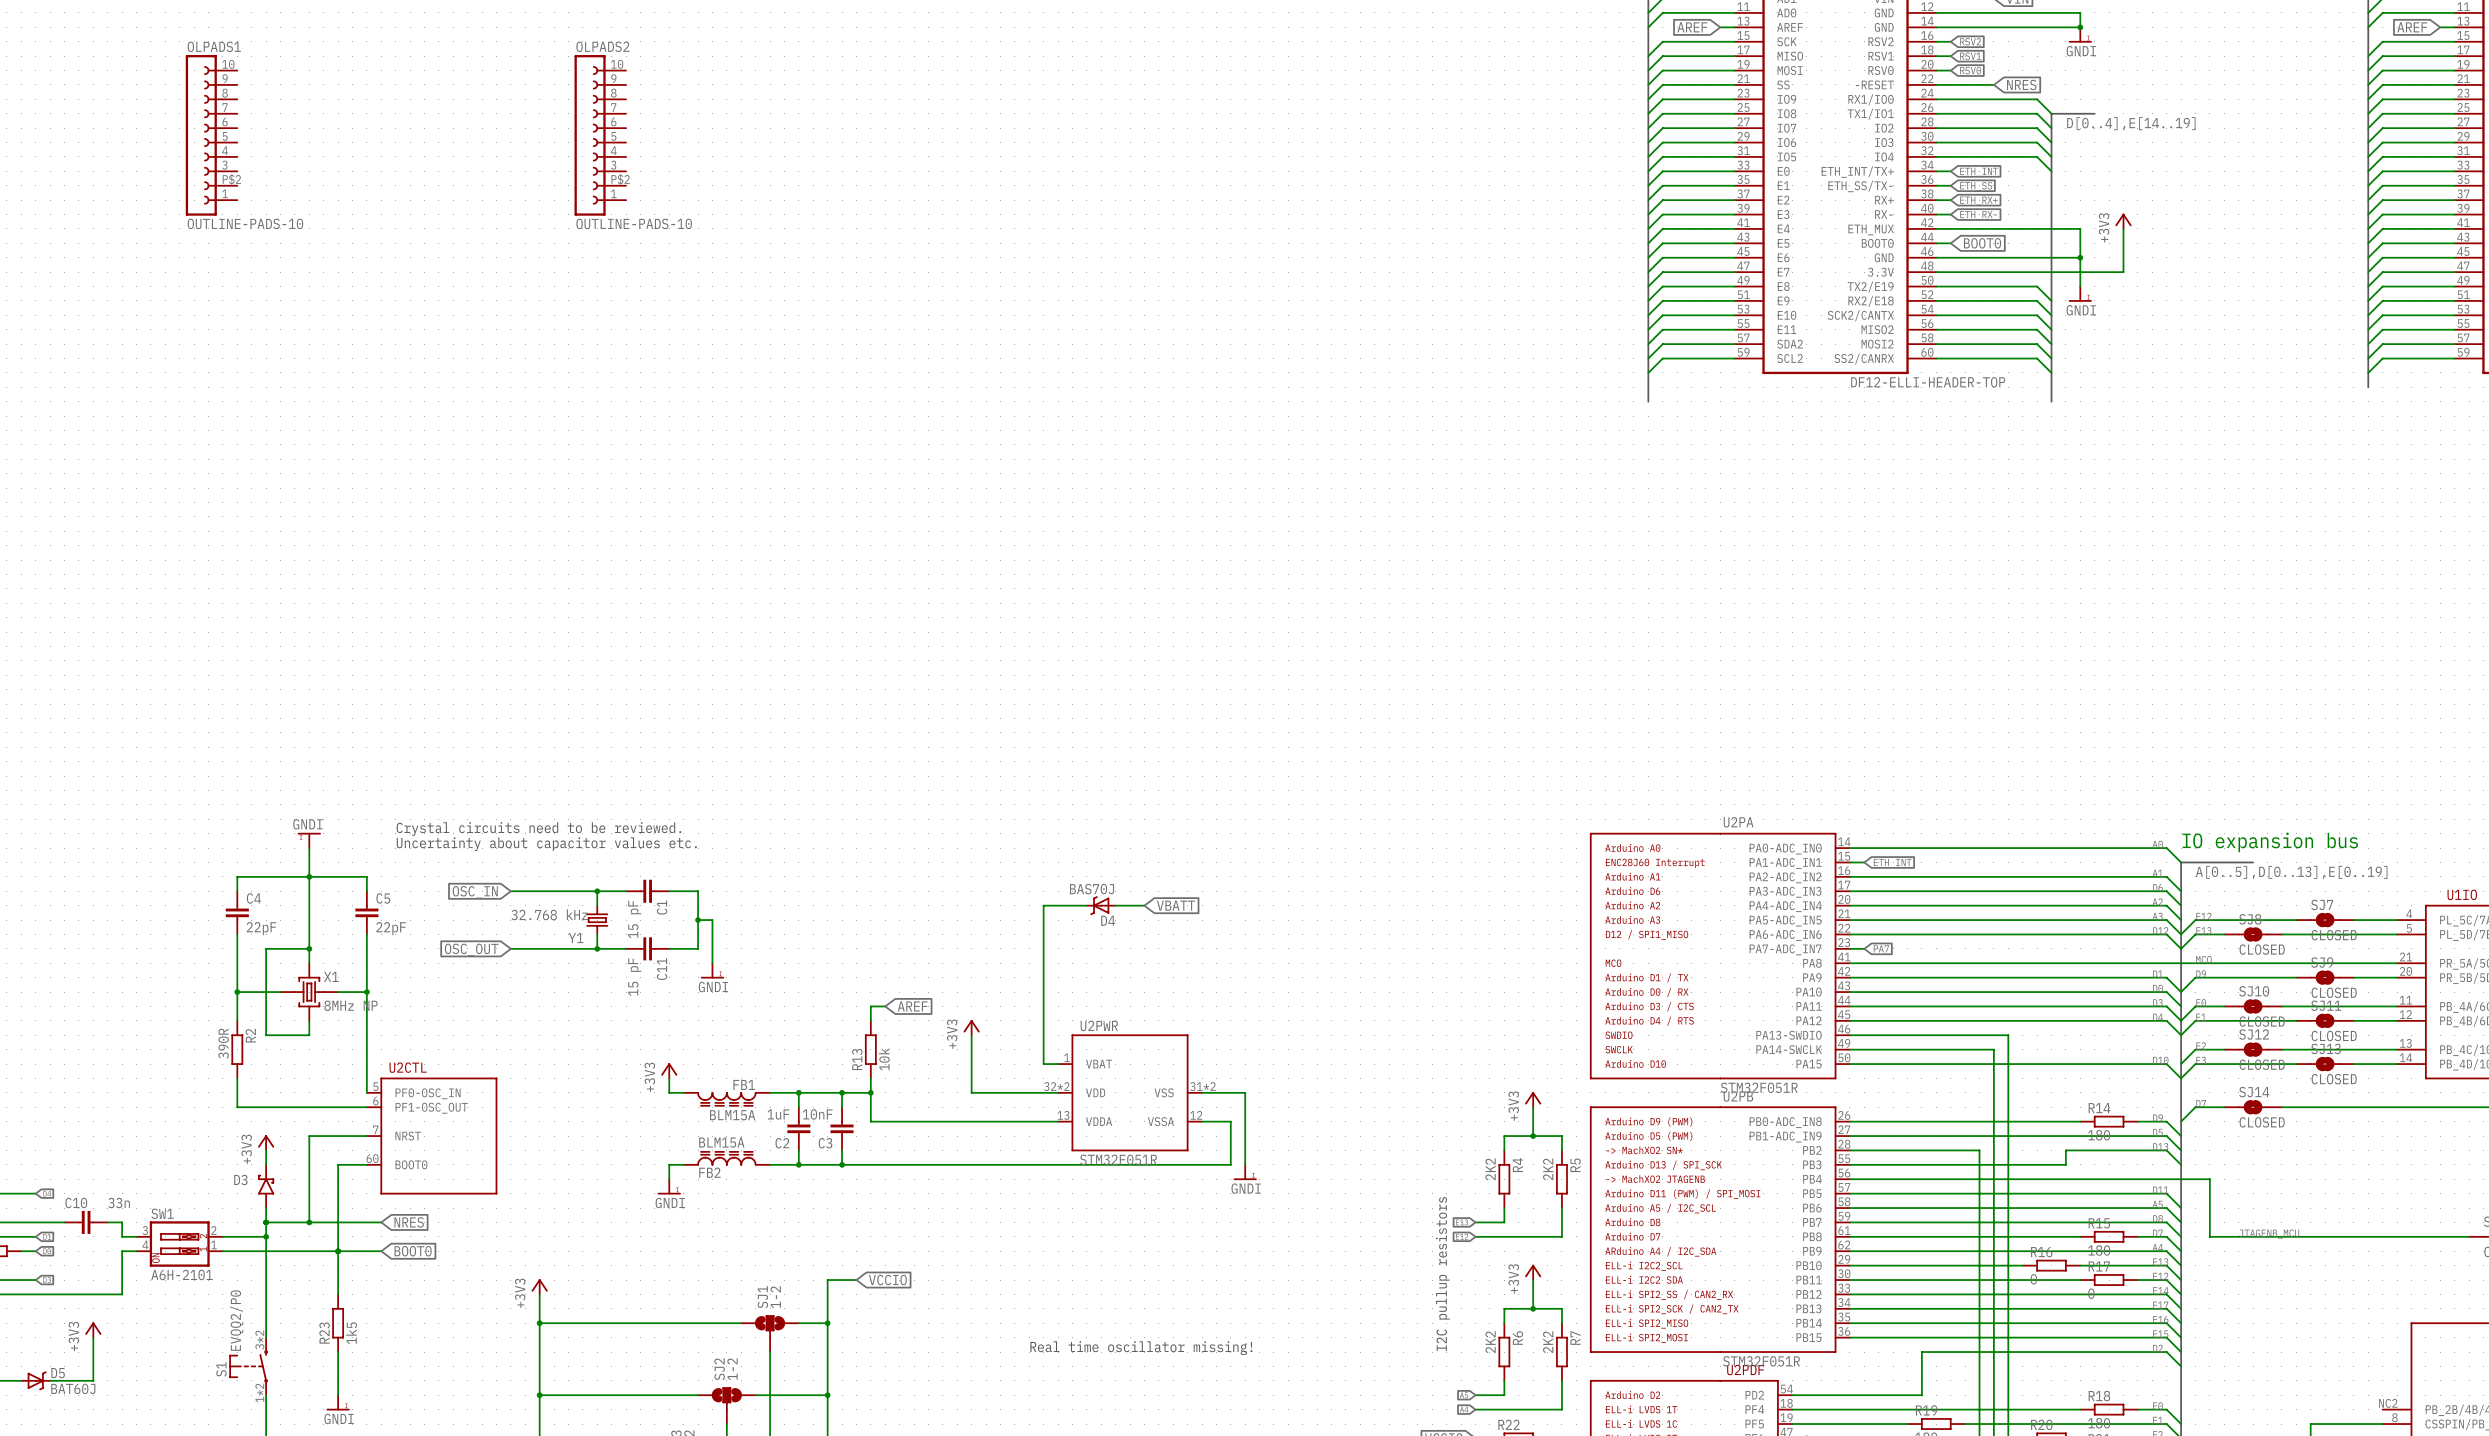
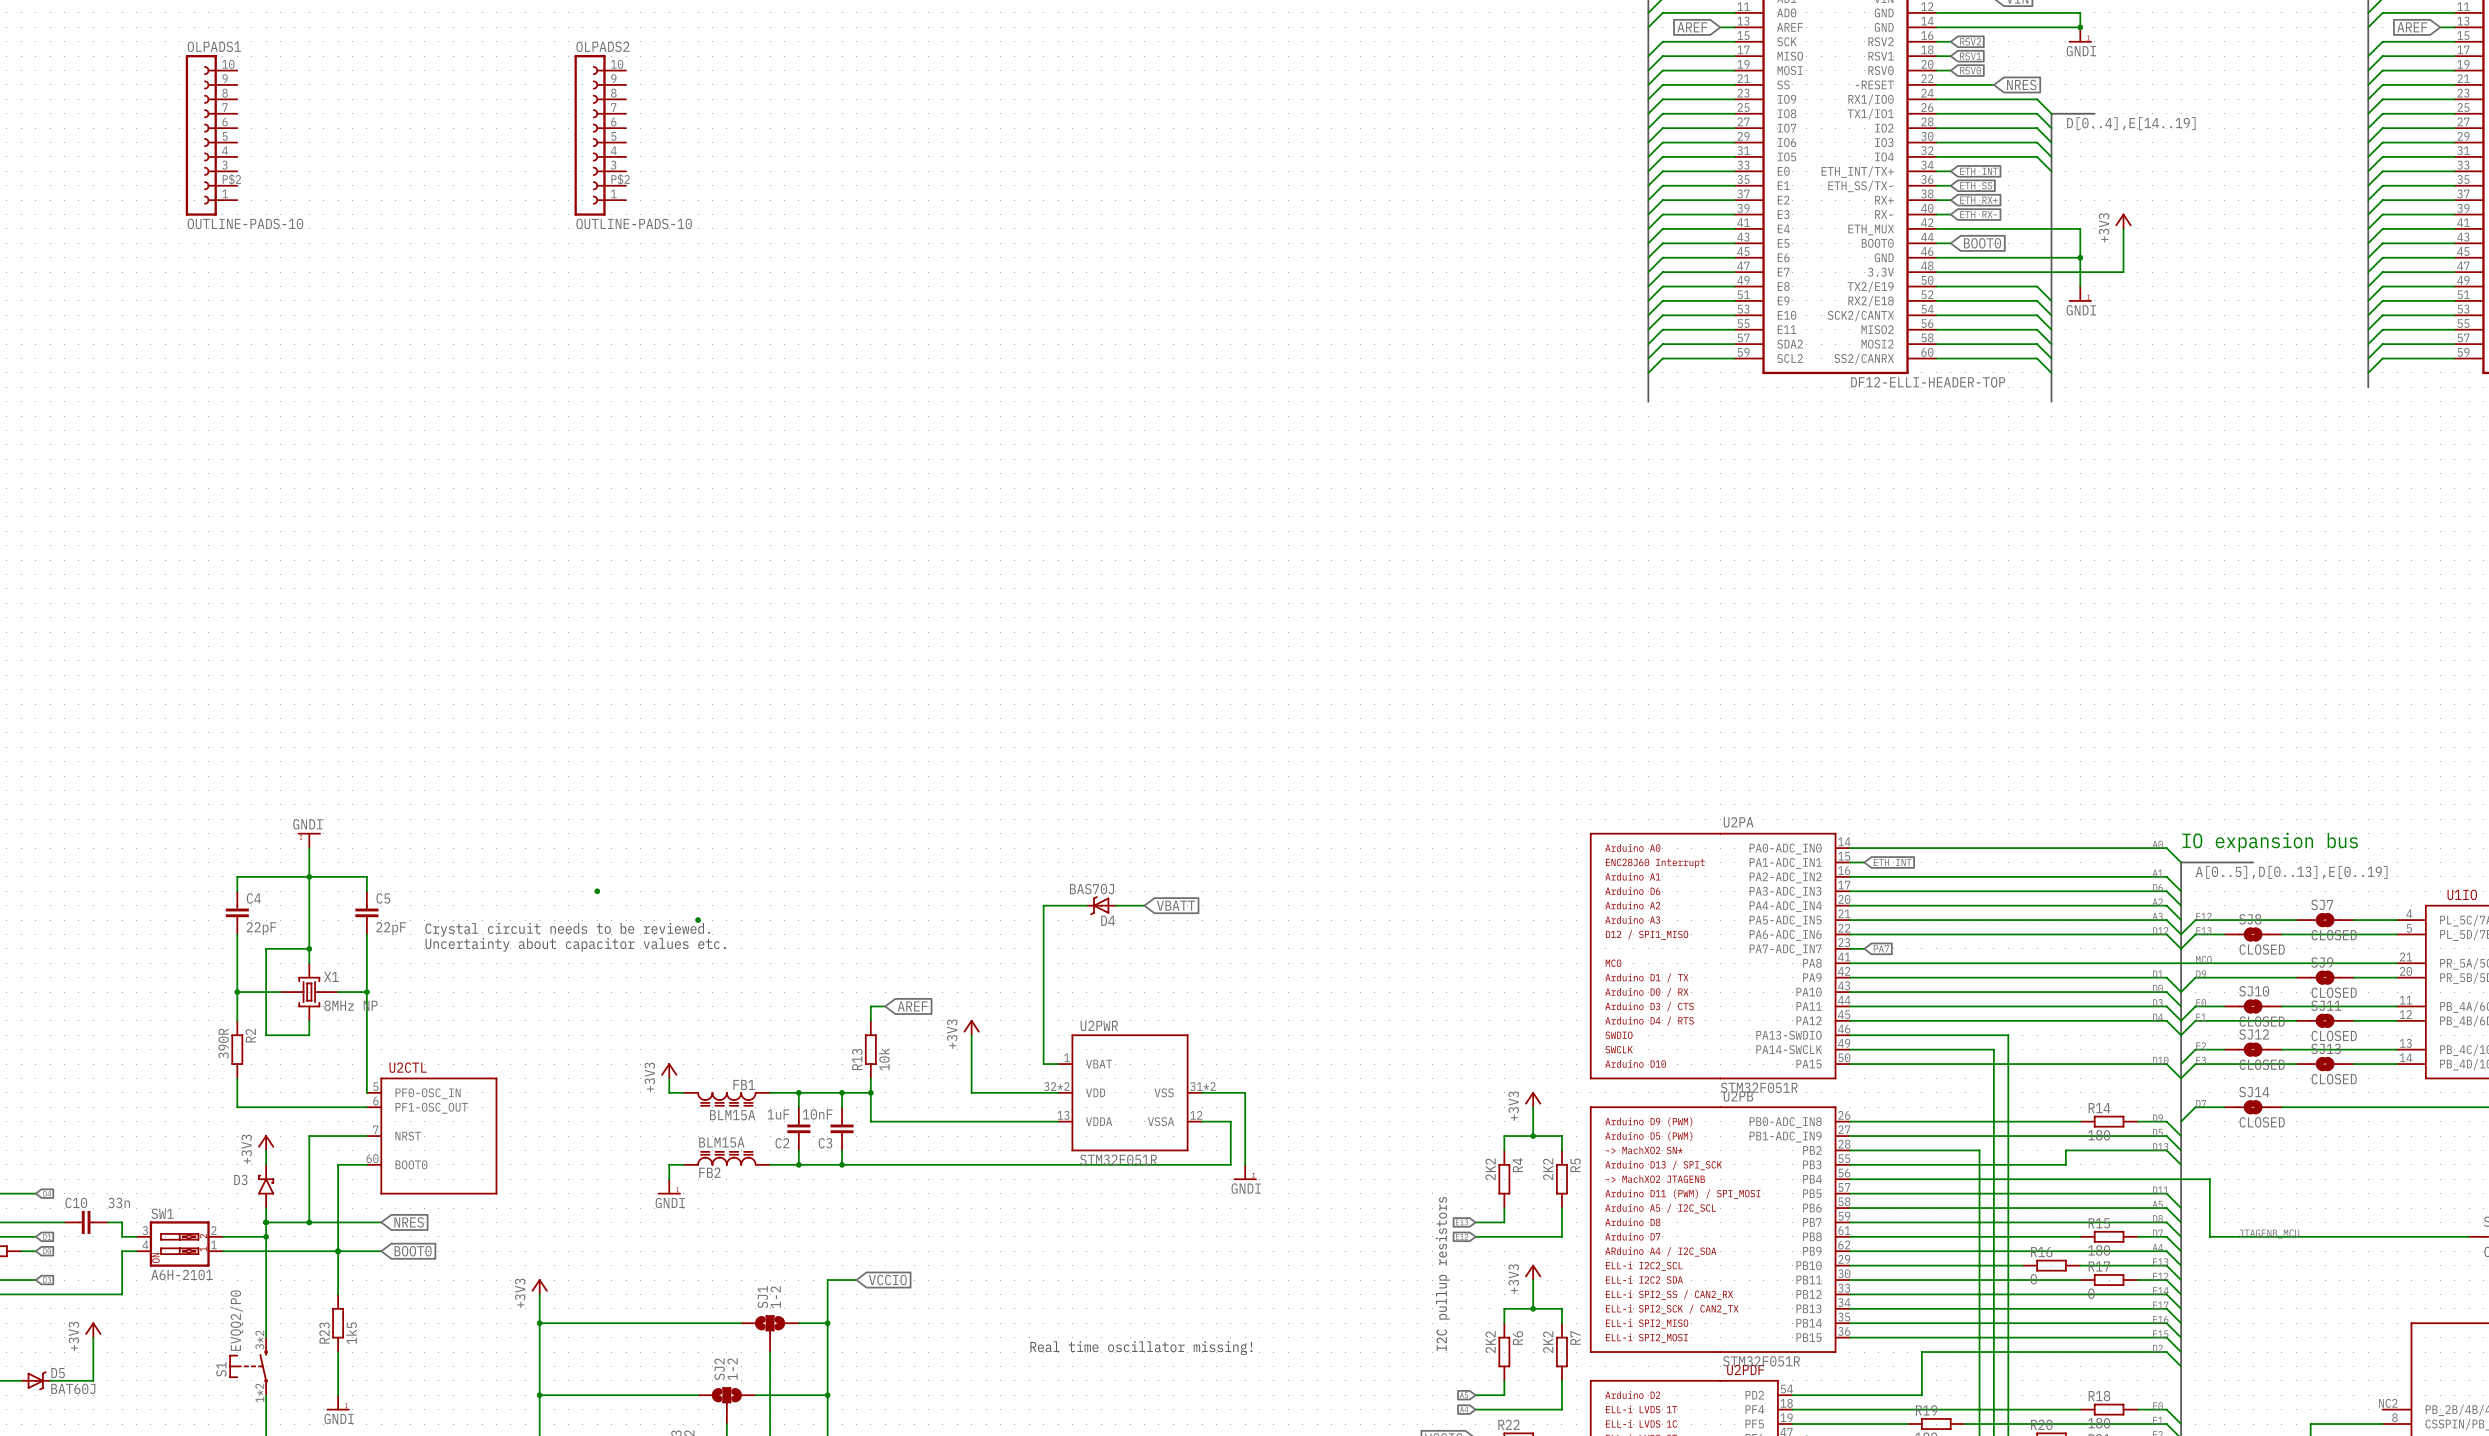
text: Crystal circuits need to be reviewed. (538, 829) -> none
text position: Uncertainty about capacitor values etc. (546, 844) -> Uncertainty about capacitor values etc. (575, 944)
wire: (510, 891) (626, 891) -> none
wire: (597, 891) (597, 905) -> none
C1: 15 pF (647, 891) -> none
wire: (669, 891) (698, 891) (698, 948) (669, 948) -> none
global label: OSC_IN (475, 892) -> none
Y1: 32.768 kHz (597, 920) -> none
wire: (698, 920) (712, 920) (712, 963) -> none
text: none -> Crystal circuit needs to be reviewed. (567, 929)
wire: (597, 934) (597, 948) -> none
wire: (510, 948) (626, 948) -> none
junction: (597, 948) -> none
C11: 15 pF (647, 948) -> none
global label: OSC_OUT (471, 950) -> none
power symbol: GNDI (712, 970) -> none

